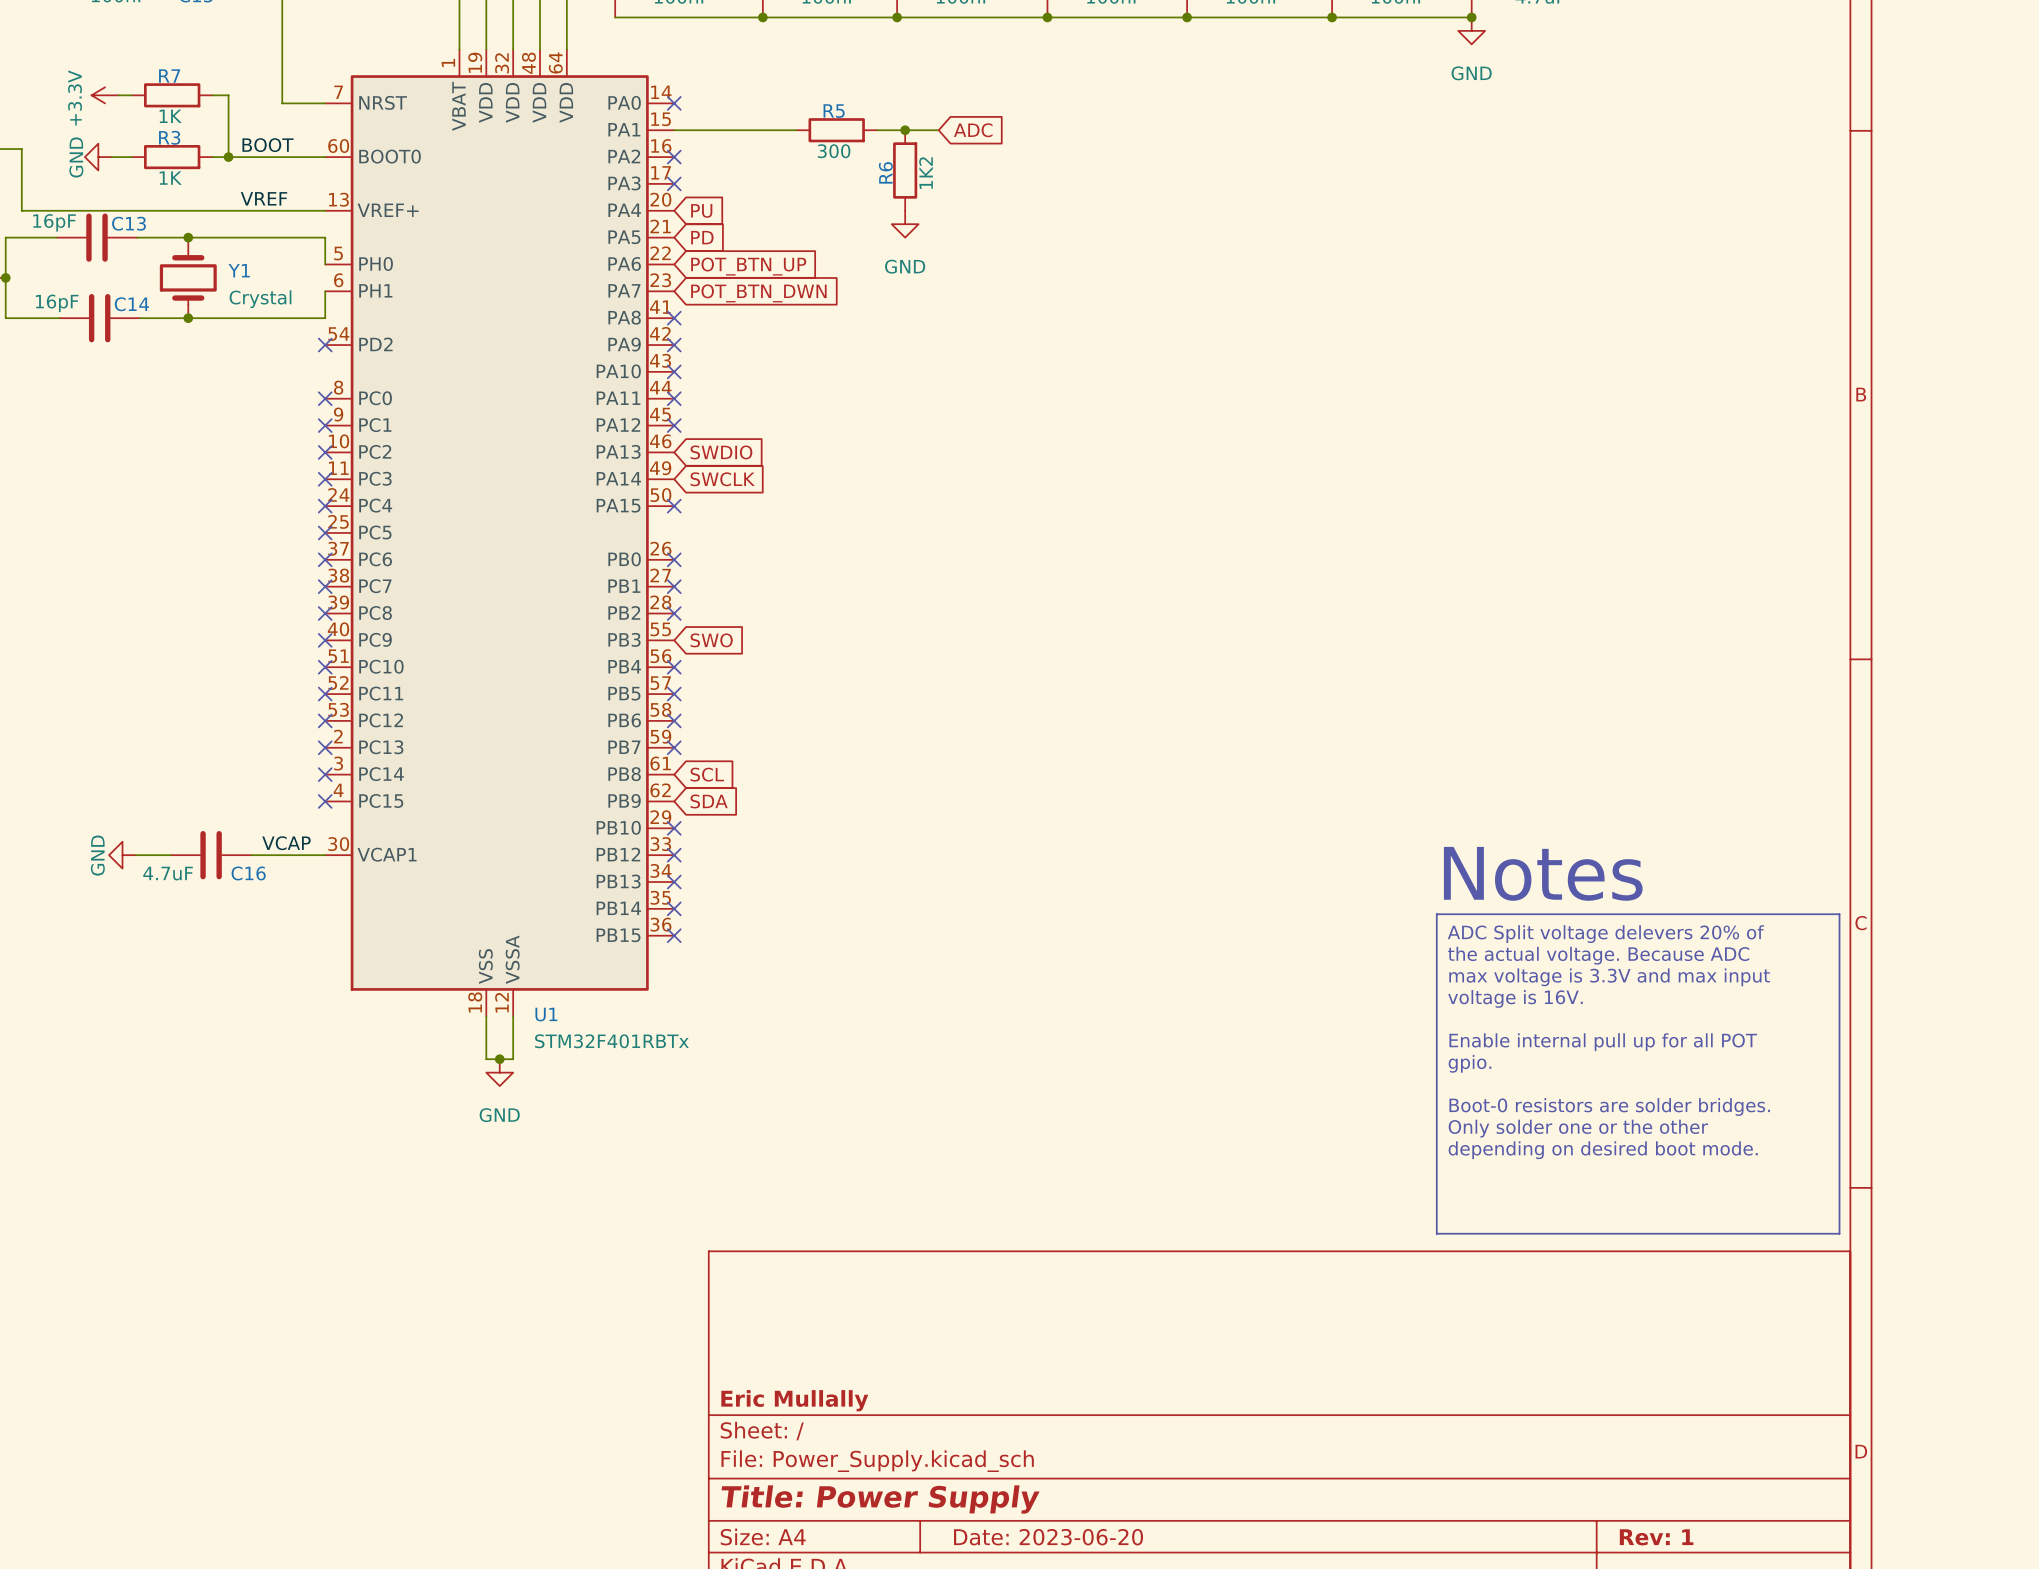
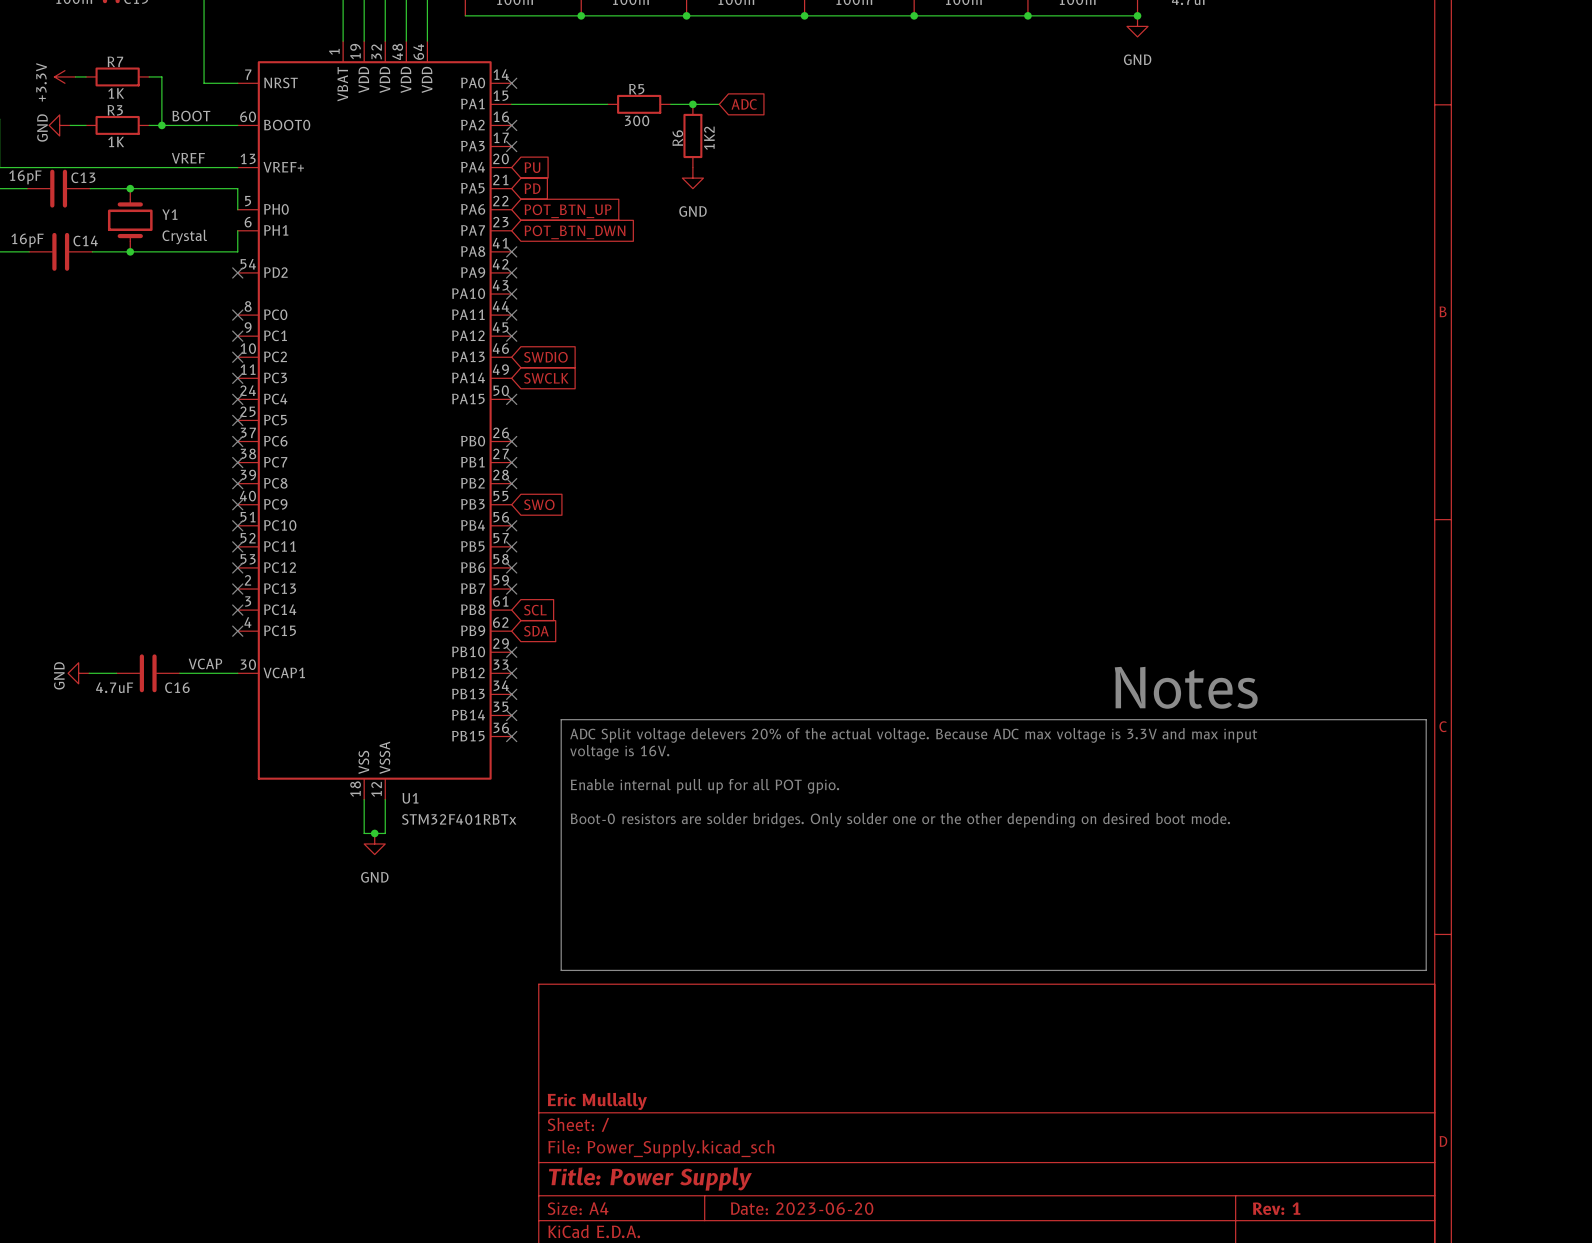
line: (1436, 914) (1436, 1233) -> (1110, 719) (561, 719) (561, 970) (1110, 970)
text: none -> ADC Split voltage delevers 20% of the actual voltage. Because ADC max voltage is 3.3V and max input (913, 735)
text: ADC Split voltage delevers 20% of (1605, 934) -> none
text: none -> voltage is 16V. (619, 752)
text: the actual voltage. Because ADC (1598, 955) -> none
text: max voltage is 3.3V and max input (1609, 977) -> none
text: none -> Enable internal pull up for all POT gpio. (704, 786)
text: voltage is 16V. (1515, 998) -> none
text: none -> Boot-0 resistors are solder bridges. Only solder one or the other depending on desired boot mode. (900, 820)
text: Enable internal pull up for all POT (1603, 1042) -> none
text: gpio. (1469, 1063) -> none
text: Boot-0 resistors are solder bridges. (1609, 1106) -> none
text: Only solder one or the other (1578, 1128) -> none
text: depending on desired boot mode. (1603, 1150) -> none

